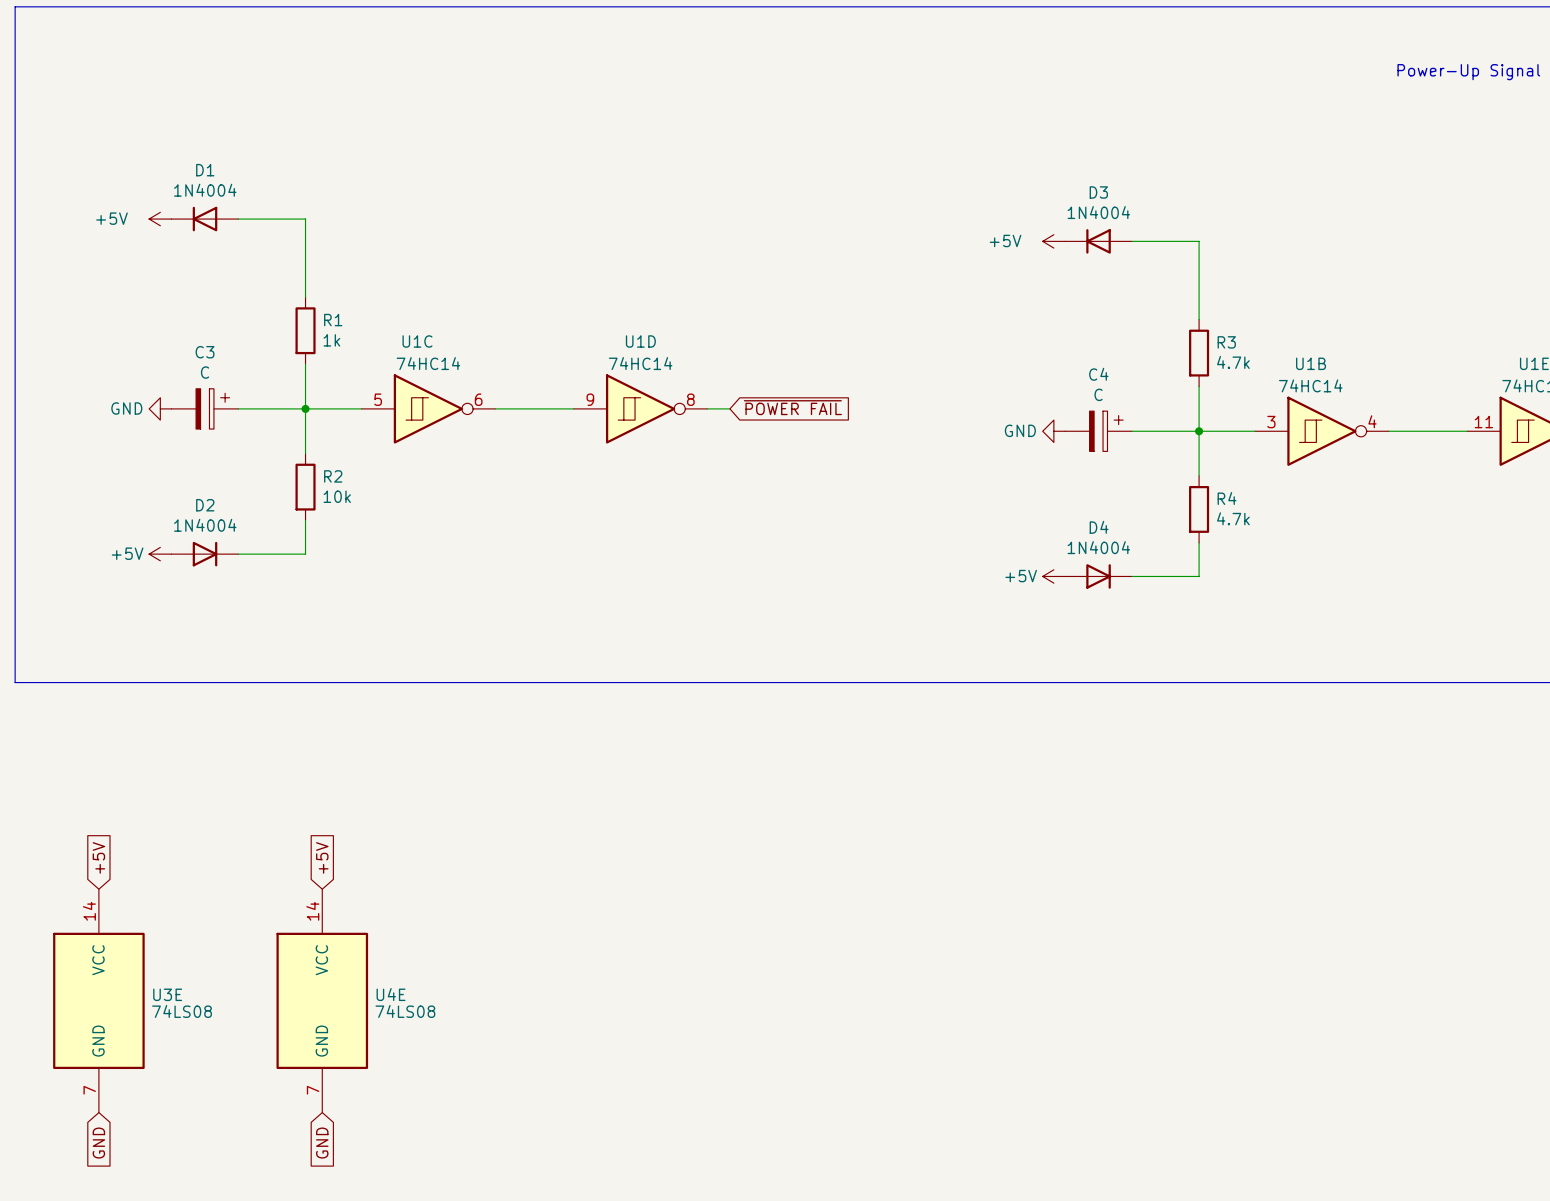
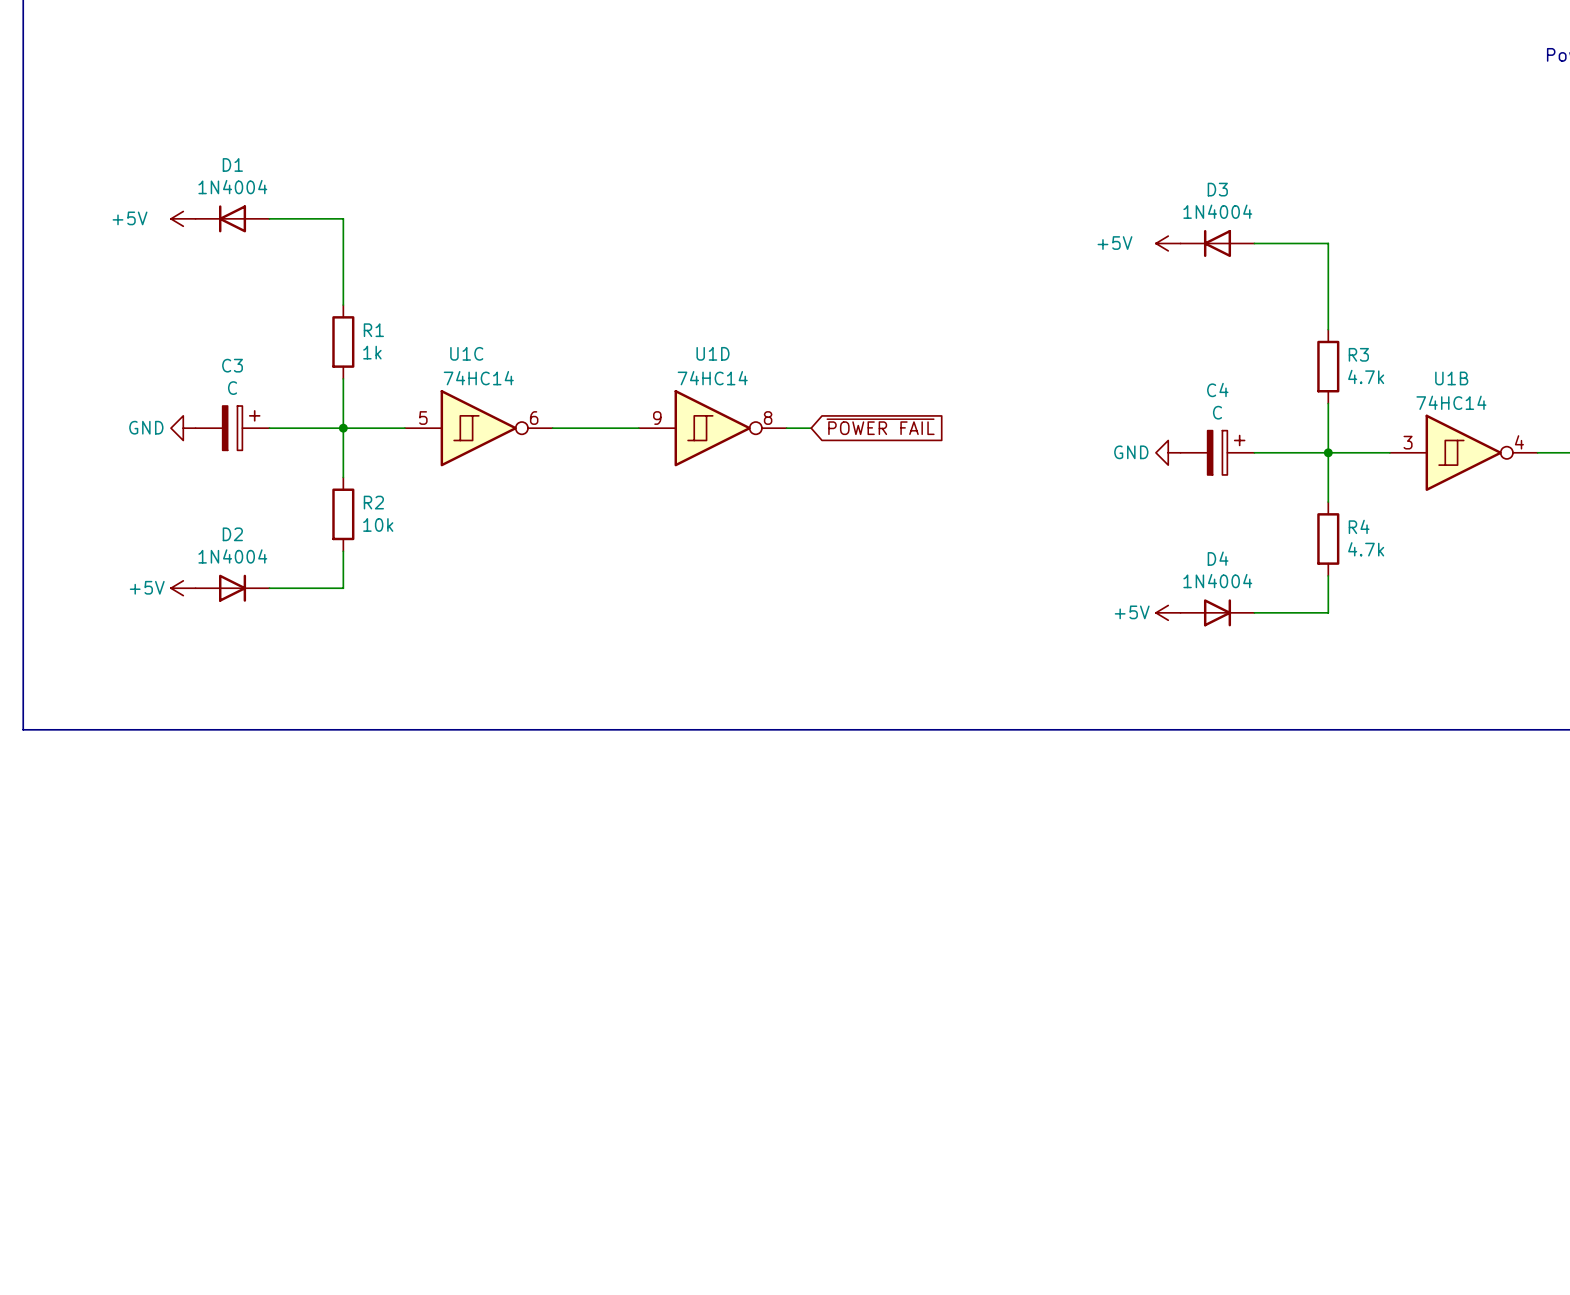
global label: +5V (98, 857) -> none
global label: +5V (322, 857) -> none
U3E: 74LS08 (98, 1000) -> none
U4E: 74LS08 (322, 1000) -> none
global label: GND (98, 1143) -> none
global label: GND (322, 1143) -> none

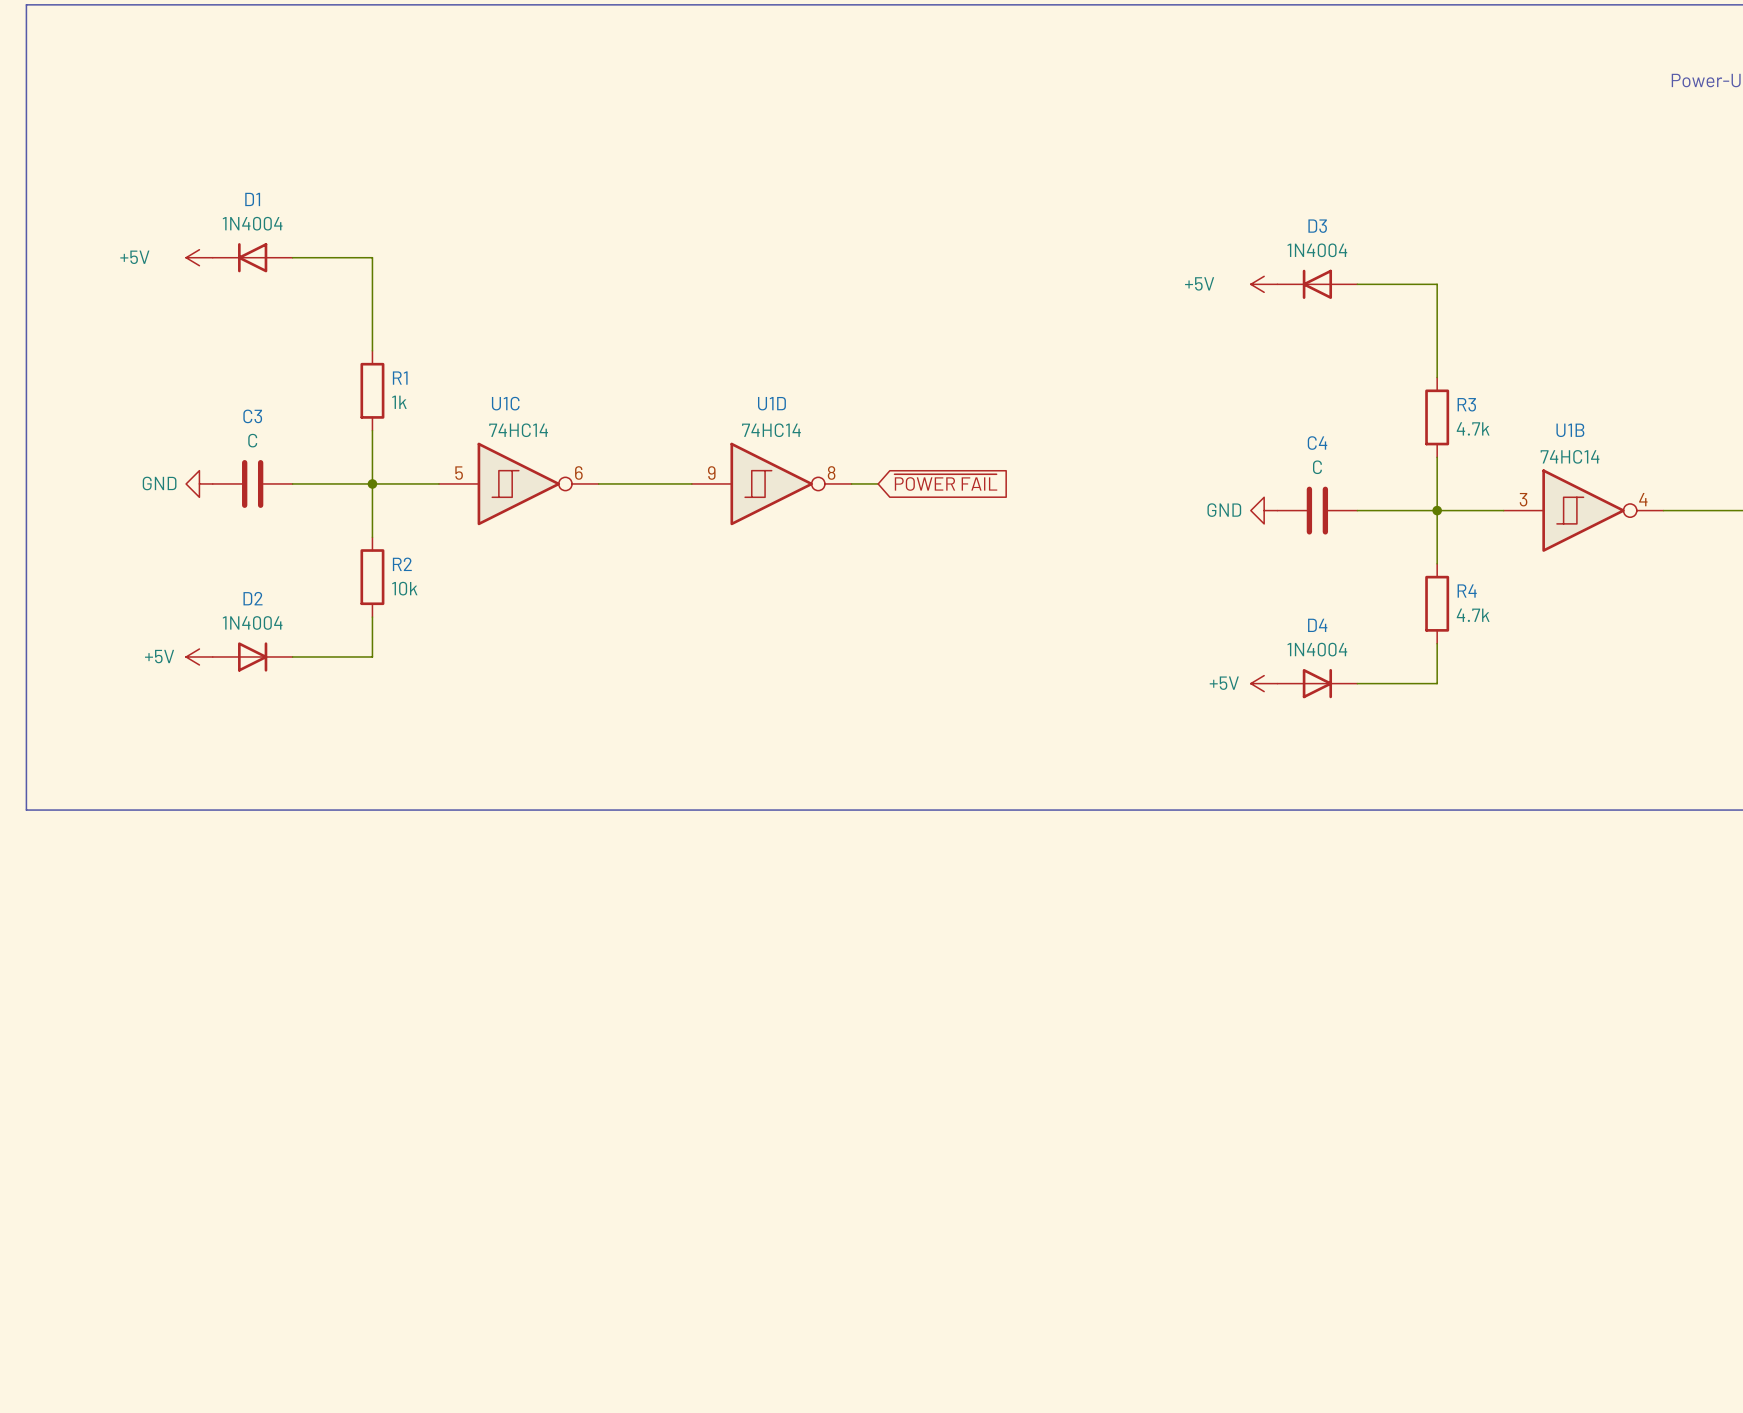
C3 symbol: [195, 406, 270, 451] -> [212, 460, 293, 508]
C4 symbol: [1180, 430, 1255, 475] -> [1277, 486, 1358, 535]

